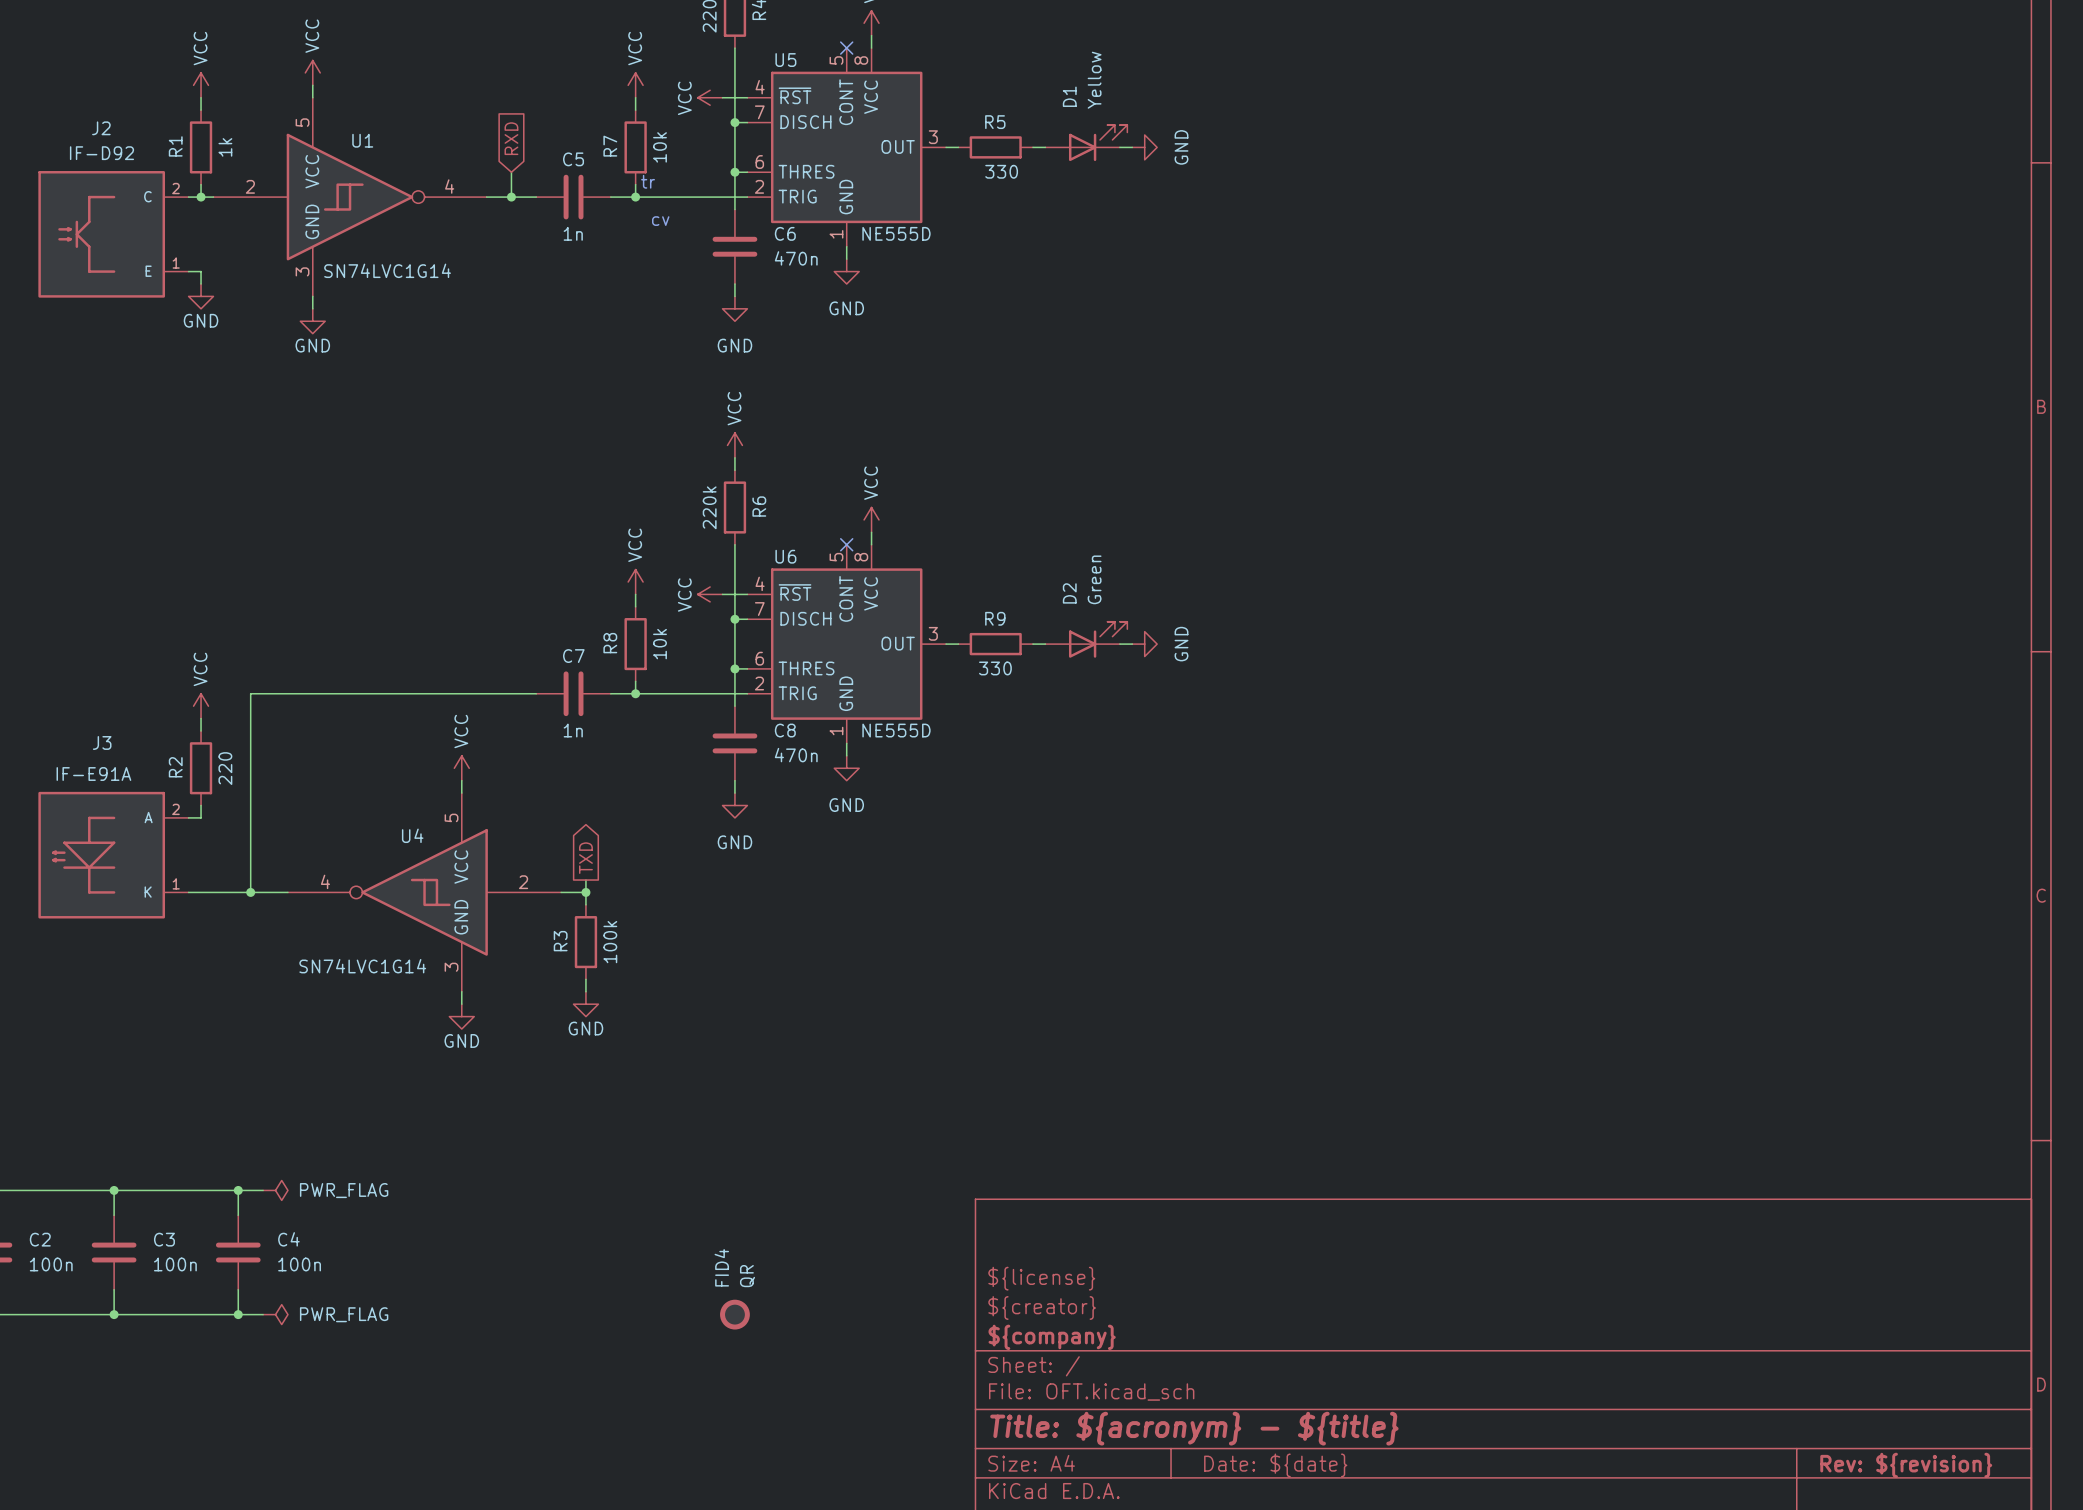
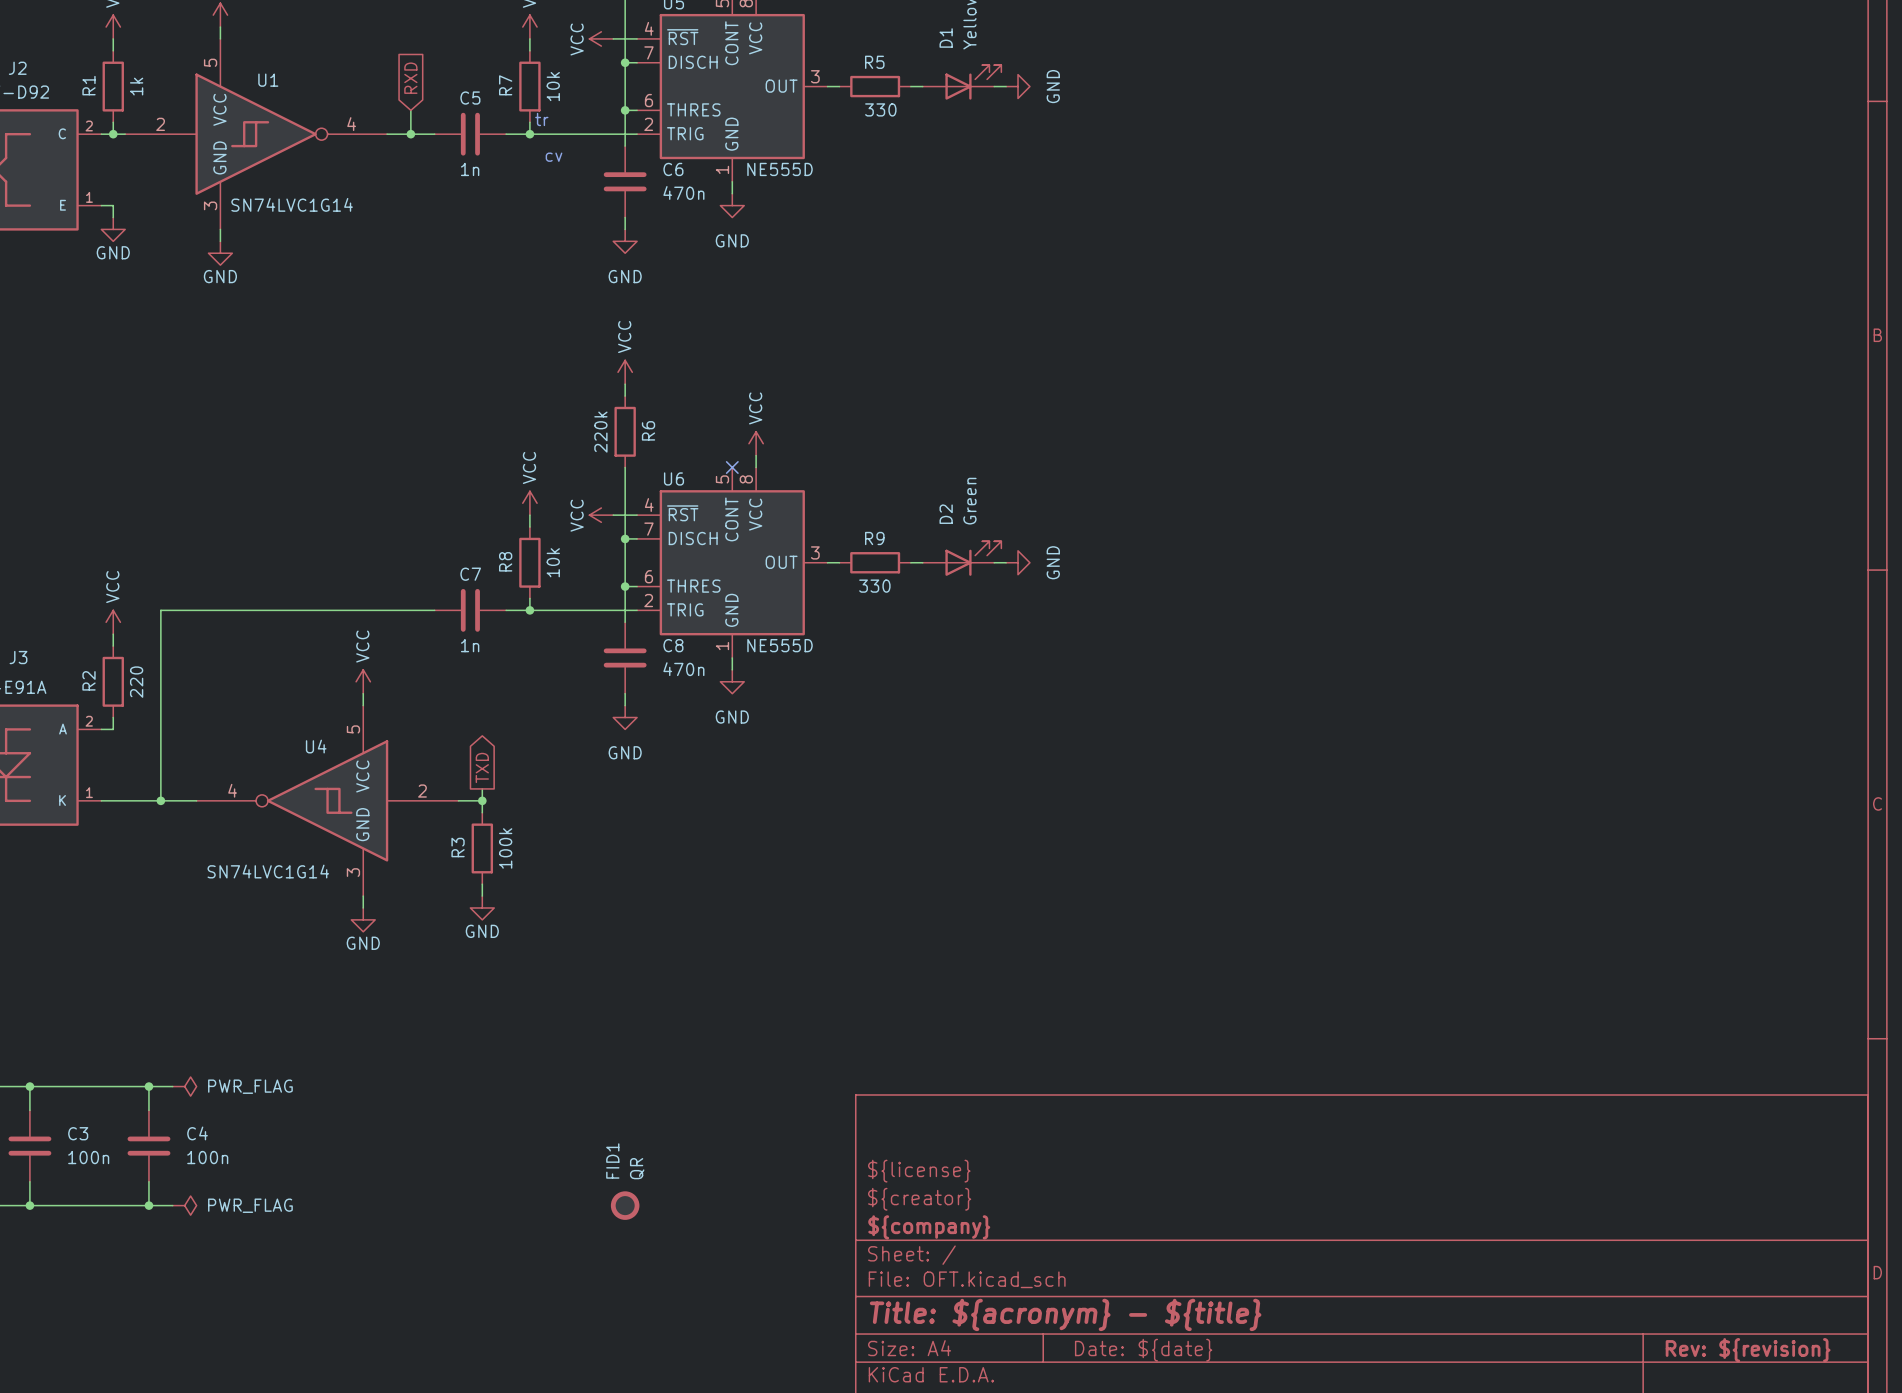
FID4 name: FID4 (721, 1267) -> FID1 (612, 1161)

